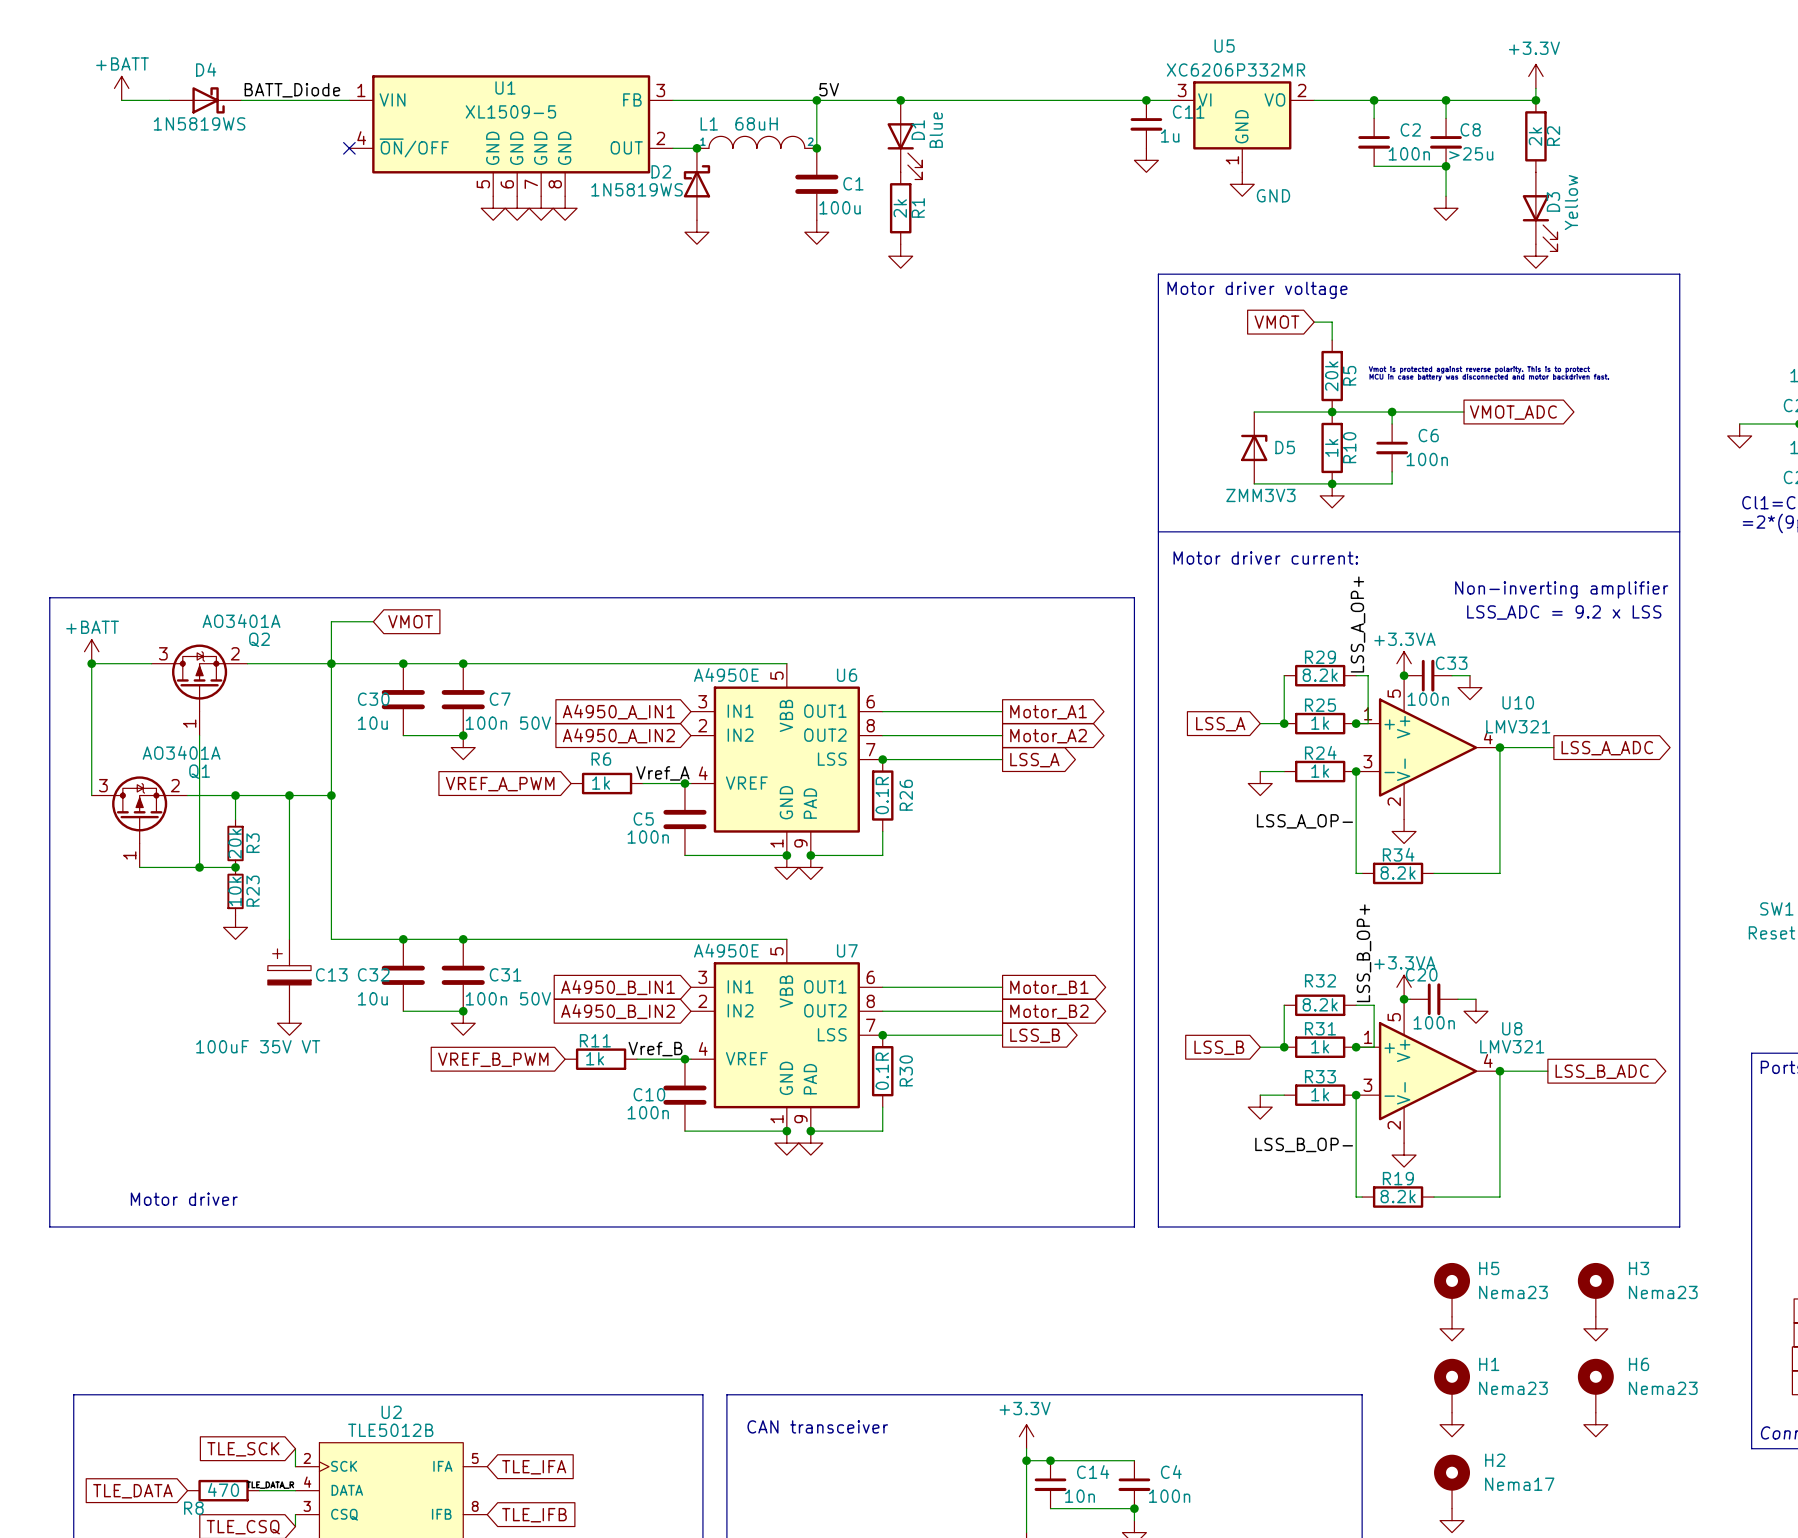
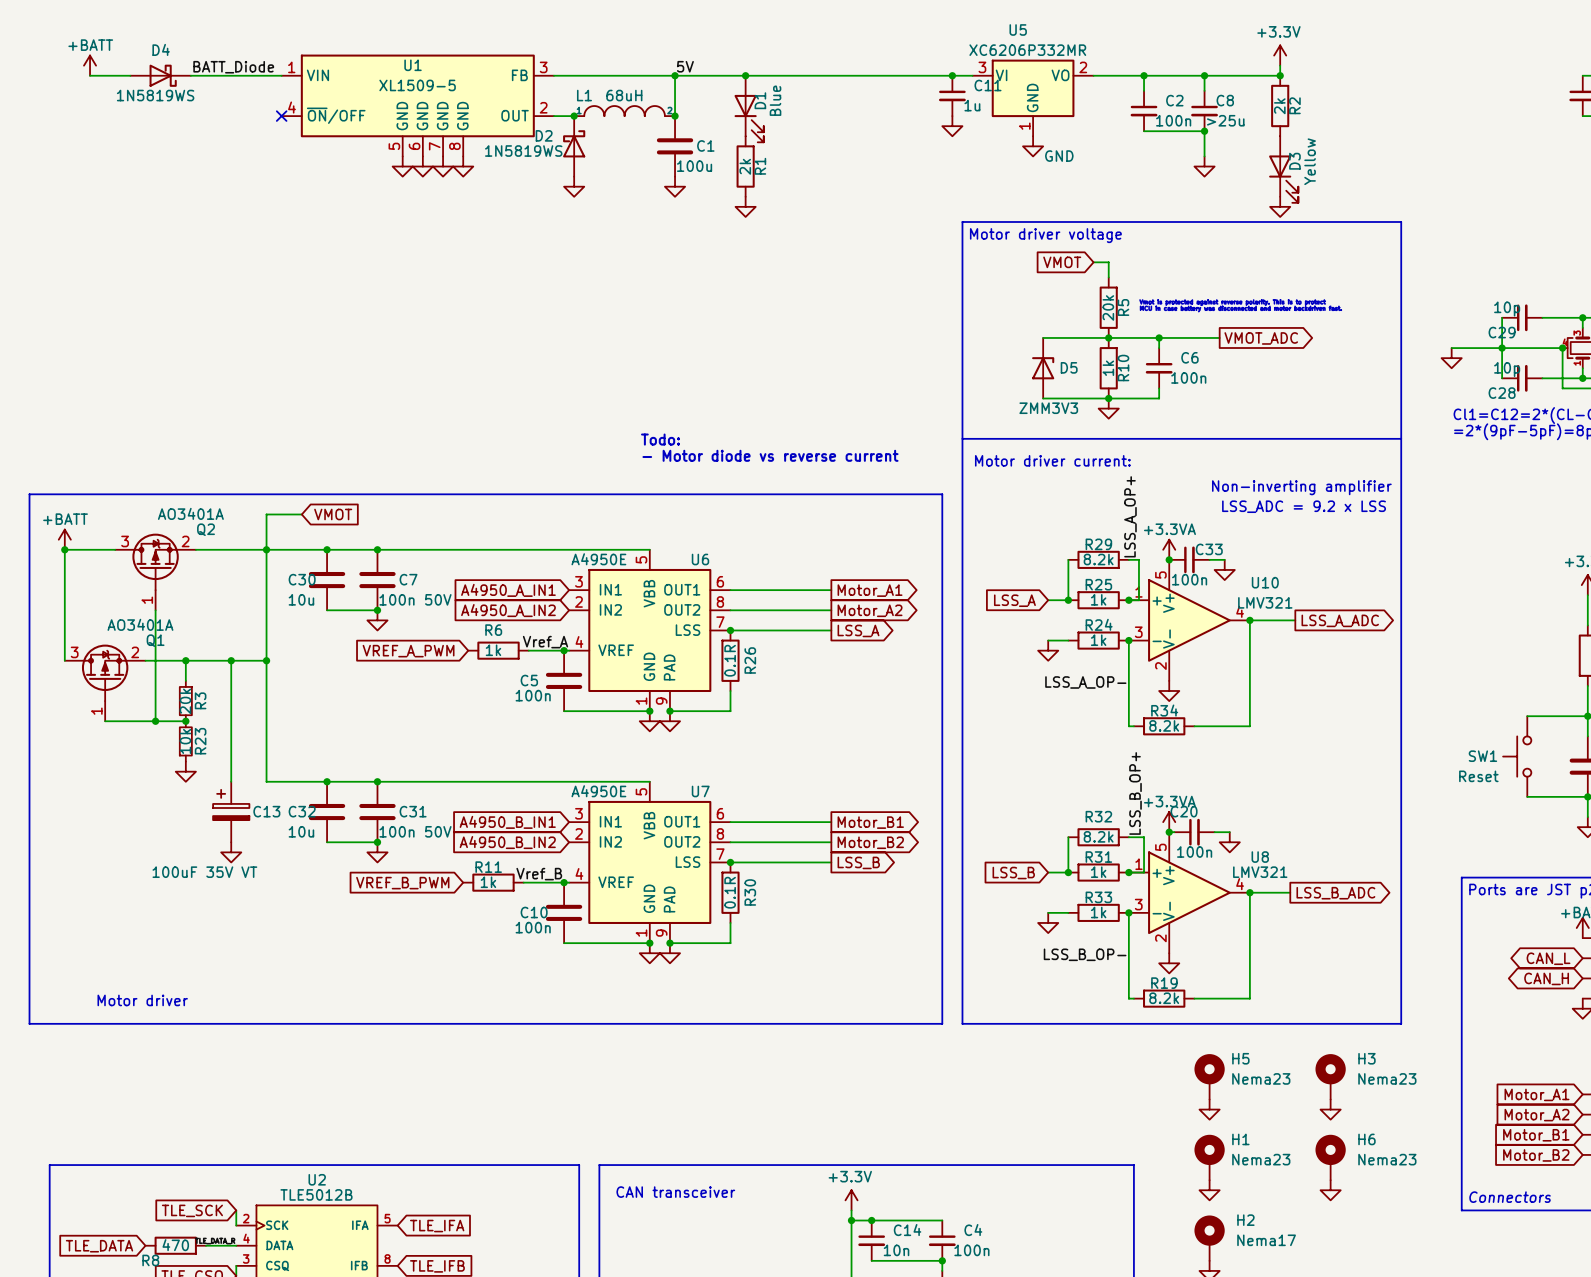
text: none -> Todo: (660, 439)
text: none -> - Motor diode vs reverse current (770, 455)

